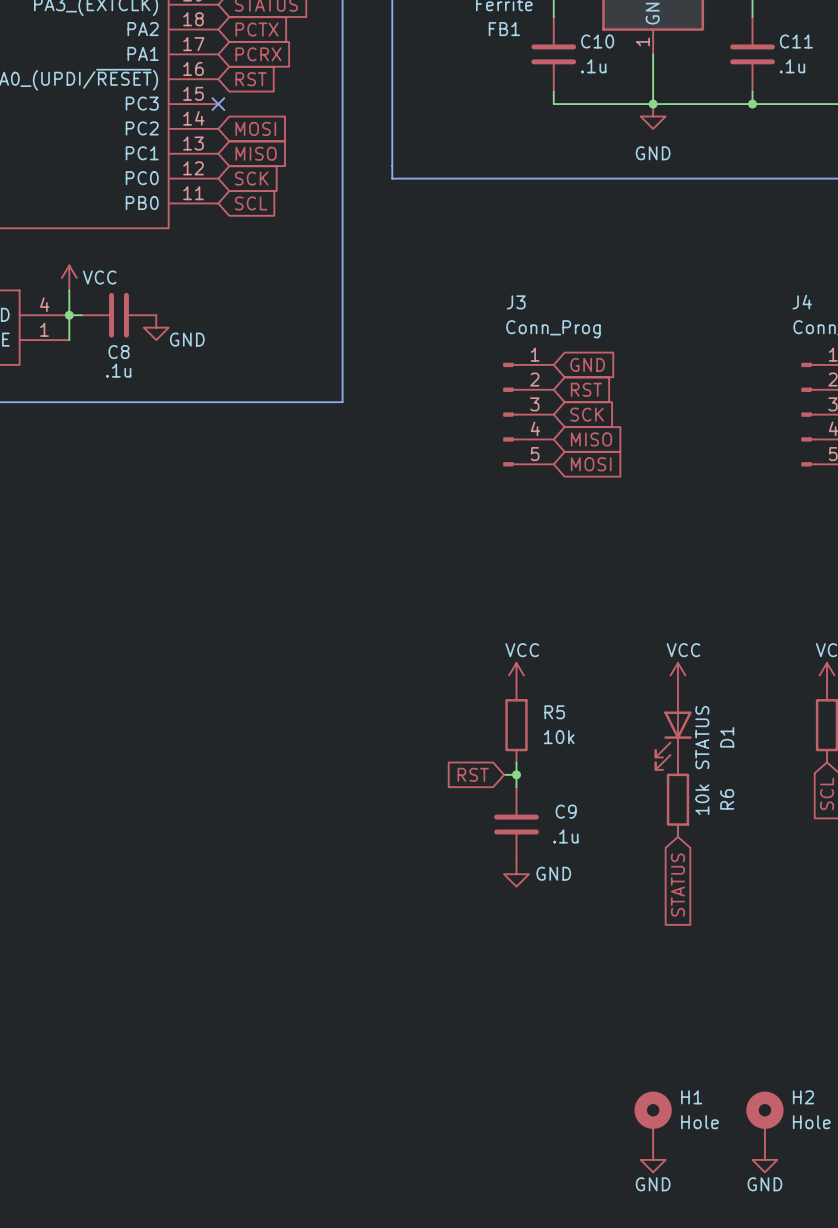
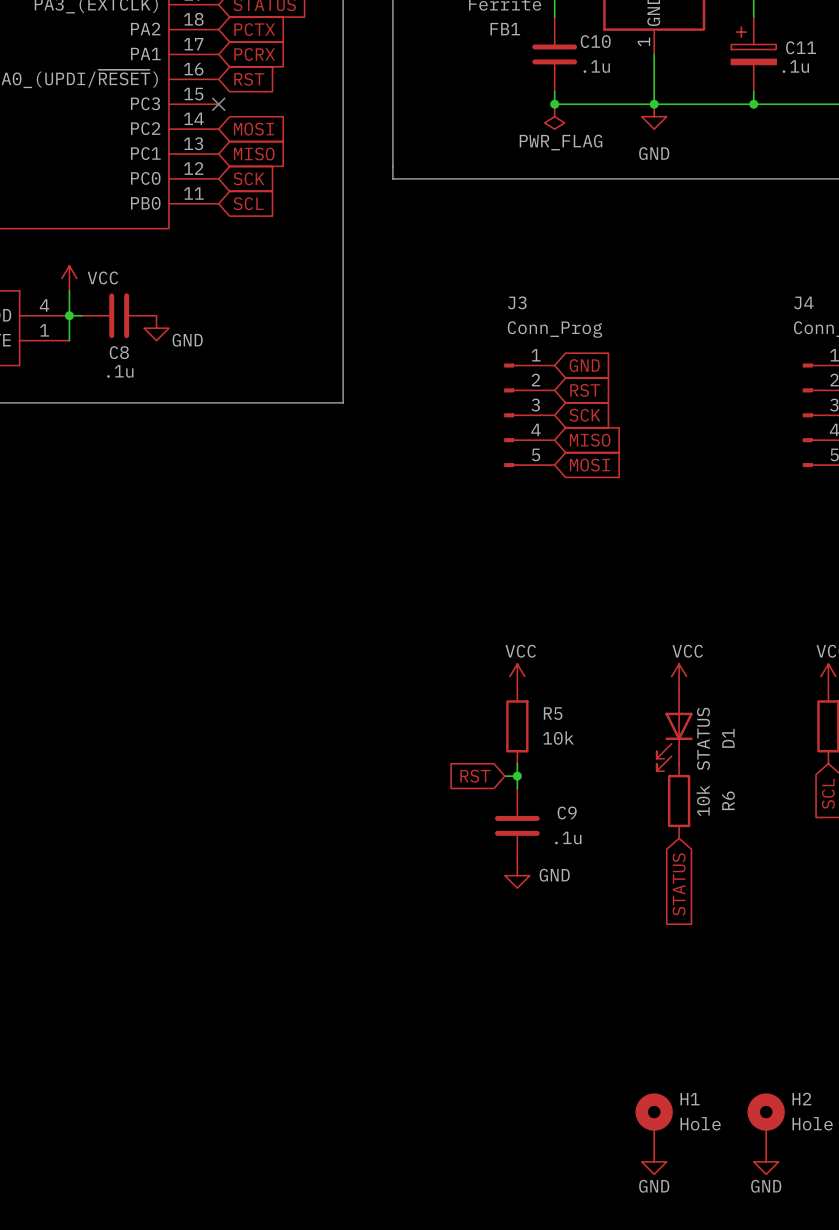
C11 symbol: [730, 17, 775, 92] -> [731, 17, 777, 92]
junction: none -> (554, 104)
power symbol: none -> PWR_FLAG (554, 116)

